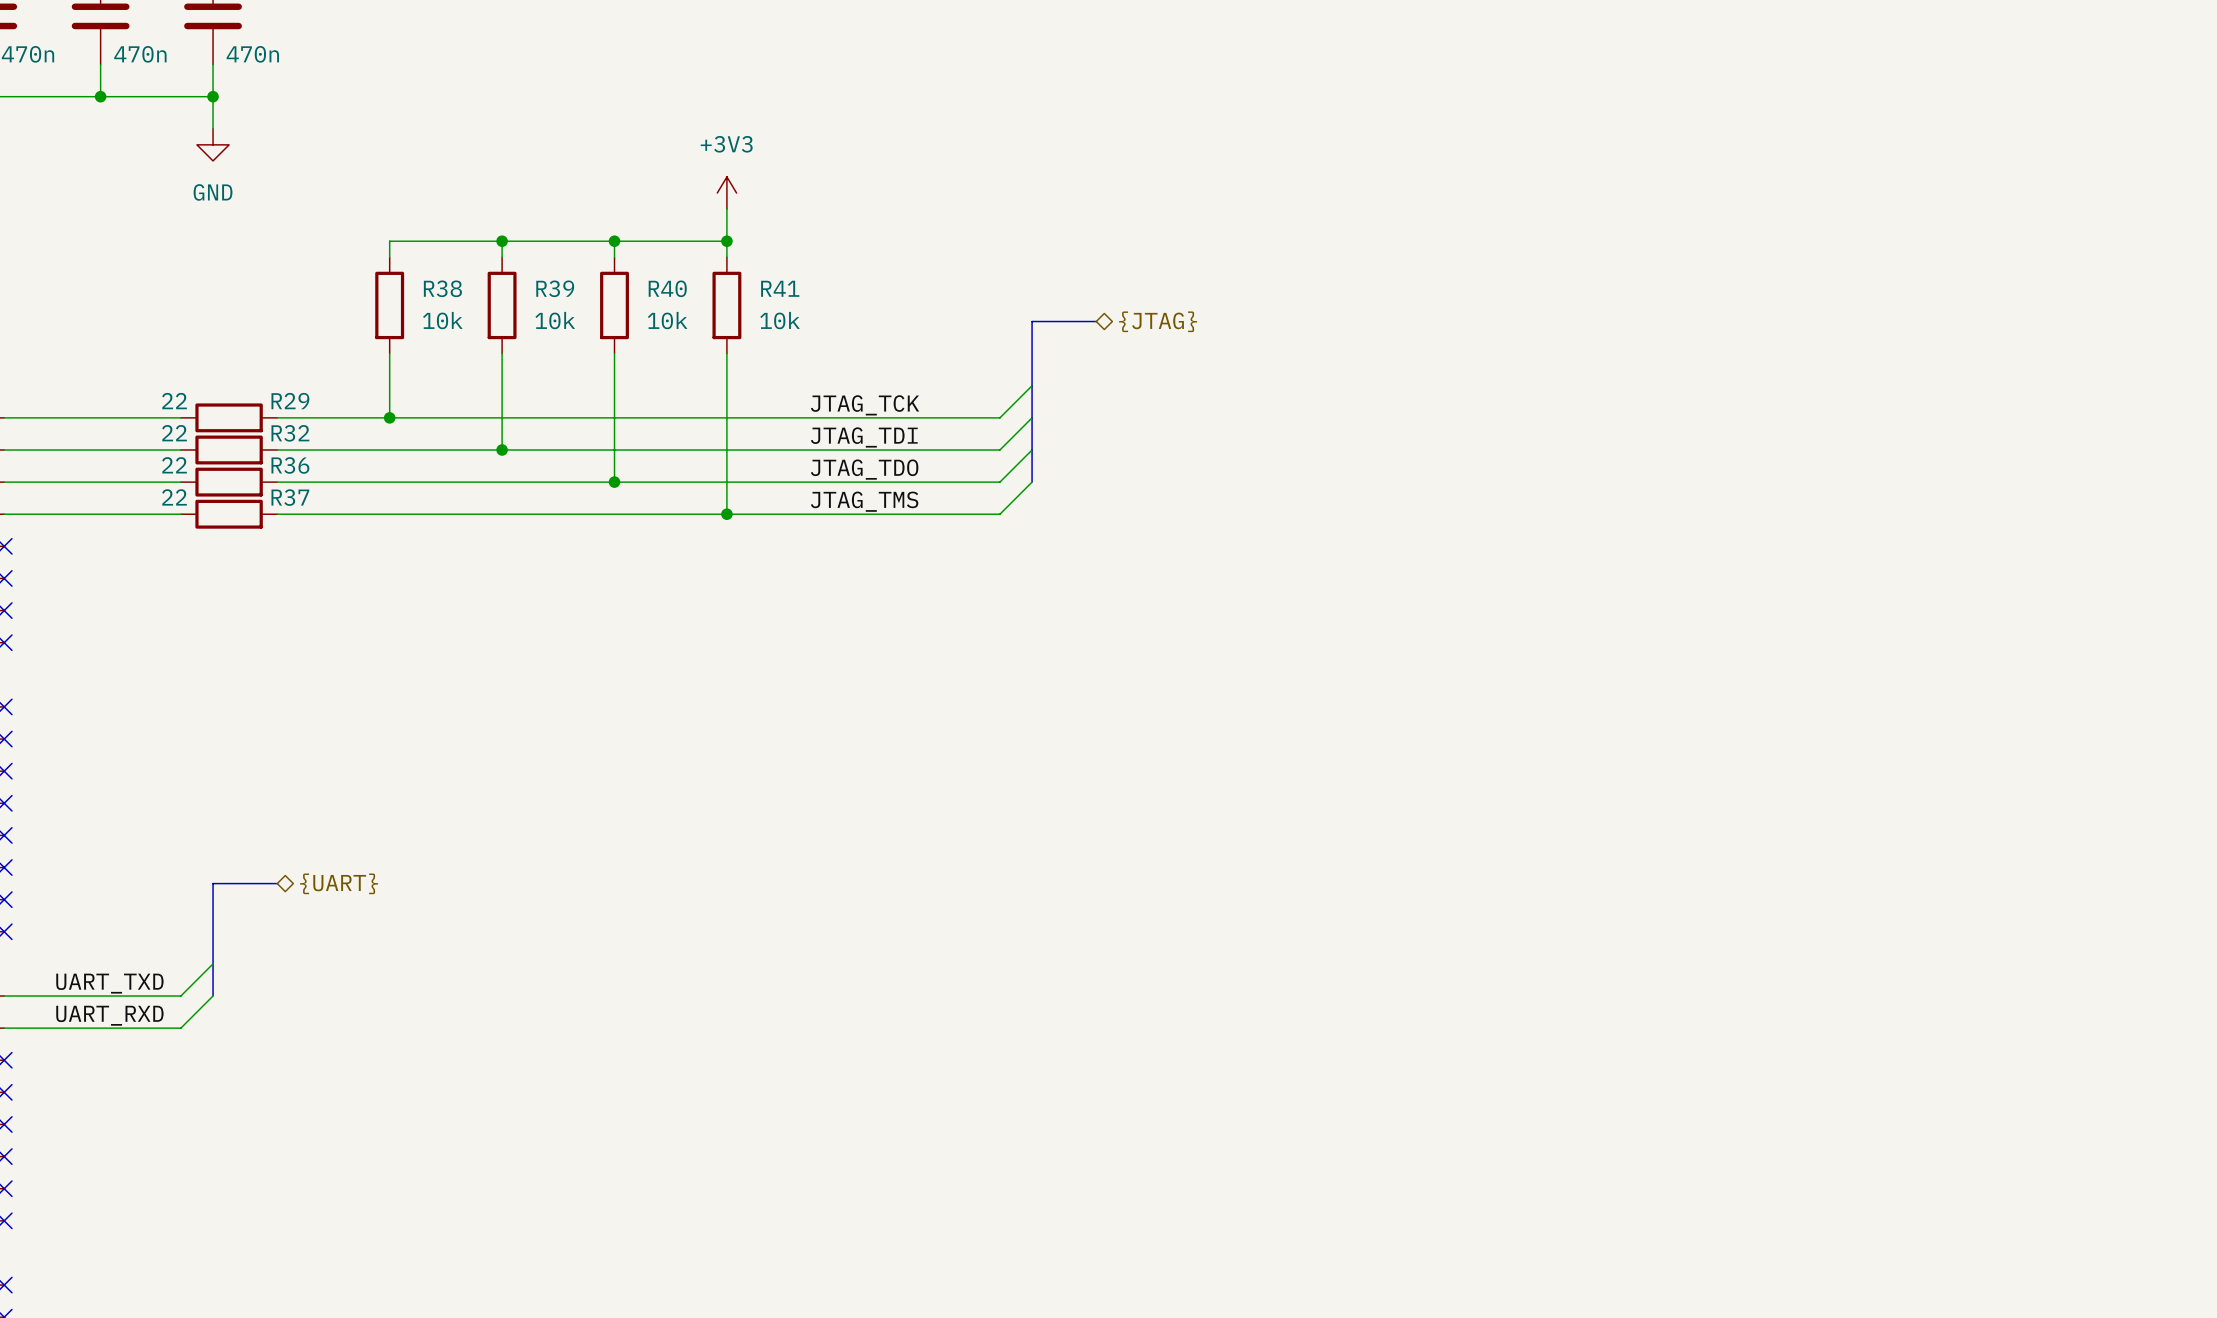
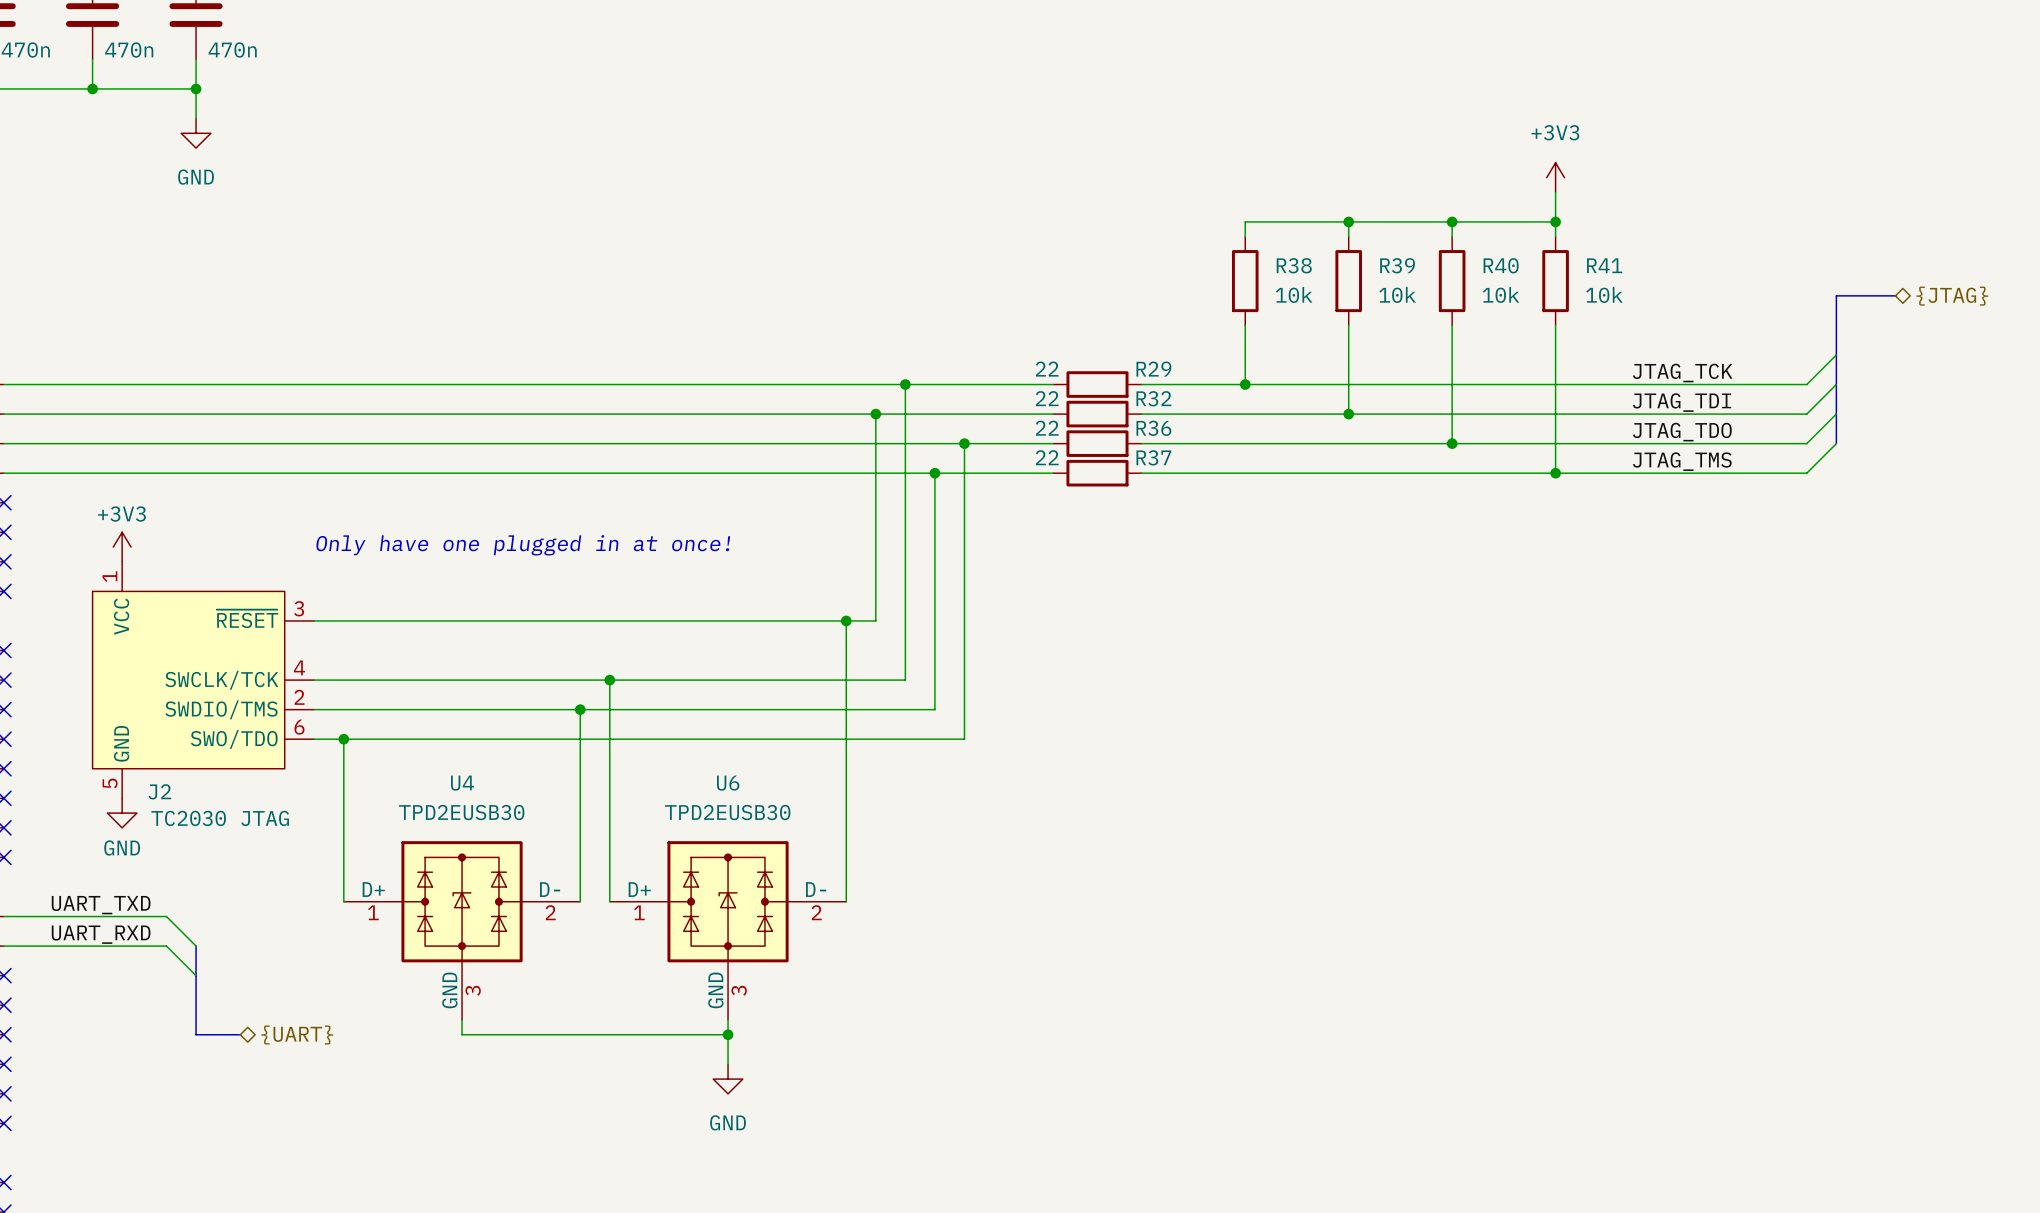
power symbol: +3V3 (726, 193) -> none
power symbol: none -> +3V3 (1555, 177)
wire: (726, 209) (726, 257) -> none
wire: none -> (1555, 192) (1555, 236)
wire: (502, 241) (502, 257) -> none
junction: (502, 241) -> none
wire: (614, 241) (614, 257) -> none
junction: (614, 241) -> none
wire: (726, 241) (389, 241) (389, 257) -> none
junction: (726, 241) -> none
wire: none -> (1348, 221) (1348, 236)
junction: none -> (1348, 221)
wire: none -> (1452, 221) (1452, 236)
junction: none -> (1452, 221)
wire: none -> (1555, 221) (1245, 221) (1245, 236)
junction: none -> (1555, 221)
R38 position: (389, 305) -> (1245, 281)
R39 position: (502, 305) -> (1348, 281)
R40 position: (614, 305) -> (1452, 281)
R41 position: (726, 305) -> (1555, 281)
bus: (1096, 321) (1032, 321) (1032, 482) -> none
hierarchical label: {JTAG} (1158, 321) -> none
bus: none -> (1895, 295) (1836, 295) (1836, 443)
hierarchical label: none -> {JTAG} (1952, 296)
wire: (389, 353) (389, 417) -> none
wire: (502, 353) (502, 449) -> none
wire: (614, 353) (614, 482) -> none
wire: (726, 353) (726, 514) -> none
wire: none -> (1245, 325) (1245, 384)
wire: none -> (1348, 325) (1348, 414)
wire: none -> (1452, 325) (1452, 443)
wire: none -> (1555, 325) (1555, 473)
wire: (1032, 385) (999, 417) -> (1053, 384) (920, 384)
wire: none -> (1836, 354) (1806, 384) (1141, 384)
label: JTAG_TCK (865, 405) -> none
label: none -> JTAG_TCK (1682, 373)
wire: none -> (166, 384) (255, 384)
R29 position: (229, 417) -> (1097, 384)
junction: (389, 417) -> none
wire: none -> (905, 384) (905, 680) (314, 680)
junction: none -> (905, 384)
wire: (1032, 417) (999, 449) -> (1053, 414) (920, 414)
junction: none -> (1245, 384)
wire: none -> (1836, 384) (1806, 414) (1141, 414)
label: JTAG_TDI (864, 437) -> none
label: none -> JTAG_TDI (1682, 402)
wire: none -> (166, 414) (255, 414)
R32 position: (229, 449) -> (1097, 414)
junction: (502, 449) -> none
wire: none -> (875, 414) (875, 620) (314, 620)
junction: none -> (875, 414)
wire: (1032, 449) (999, 482) -> (1053, 443) (920, 443)
junction: none -> (1348, 414)
wire: none -> (1836, 414) (1806, 443) (1141, 443)
label: JTAG_TDO (864, 469) -> none
label: none -> JTAG_TDO (1682, 432)
wire: none -> (166, 443) (255, 443)
R36 position: (229, 482) -> (1097, 443)
junction: (614, 482) -> none
wire: (1032, 482) (999, 514) -> (1053, 473) (920, 473)
wire: none -> (964, 443) (964, 739) (314, 739)
junction: none -> (964, 443)
junction: none -> (1452, 443)
wire: none -> (1836, 443) (1806, 473) (1141, 473)
label: JTAG_TMS (864, 501) -> none
label: none -> JTAG_TMS (1682, 461)
wire: none -> (166, 473) (255, 473)
R37 position: (229, 514) -> (1097, 473)
junction: (726, 514) -> none
wire: none -> (934, 473) (934, 709) (314, 709)
junction: none -> (934, 473)
junction: none -> (1555, 473)
text: none -> Only have one plugged in at once! (523, 545)
power symbol: none -> +3V3 (122, 547)
wire: none -> (846, 620) (846, 901)
junction: none -> (846, 620)
J2: none -> (203, 680)
wire: none -> (609, 680) (609, 901)
junction: none -> (609, 680)
wire: none -> (580, 709) (580, 901)
junction: none -> (580, 709)
wire: none -> (343, 739) (343, 901)
junction: none -> (343, 739)
power symbol: none -> GND (122, 813)
bus: (277, 883) (213, 883) (213, 996) -> none
hierarchical label position: {UART} (339, 883) -> {UART} (297, 1035)
wire: (213, 963) (180, 996) -> (196, 946) (166, 916)
wire: (213, 996) (180, 1028) -> (196, 975) (166, 946)
U4: none -> TPD2EUSB30 (462, 930)
U6: none -> TPD2EUSB30 (728, 930)
bus: none -> (196, 946) (196, 1034) (240, 1034)
wire: none -> (462, 1019) (462, 1034) (728, 1034)
wire: none -> (728, 1019) (728, 1064)
junction: none -> (728, 1034)
power symbol: none -> GND (728, 1079)

